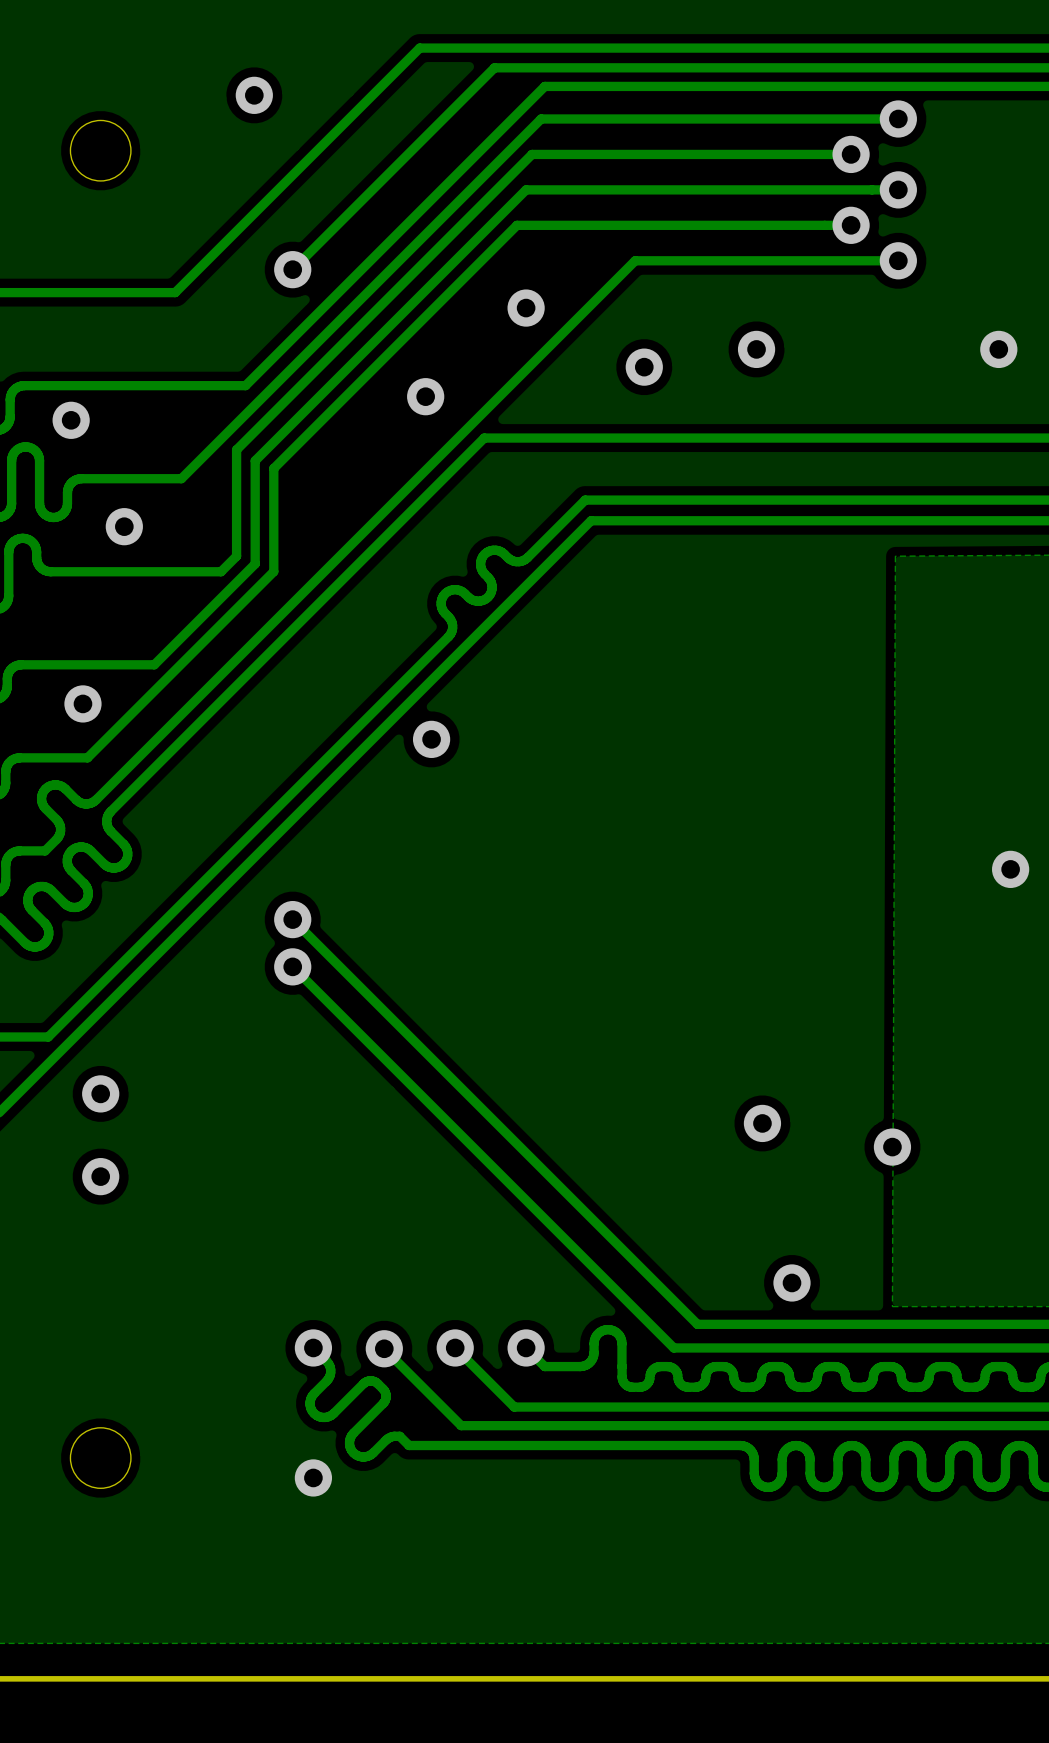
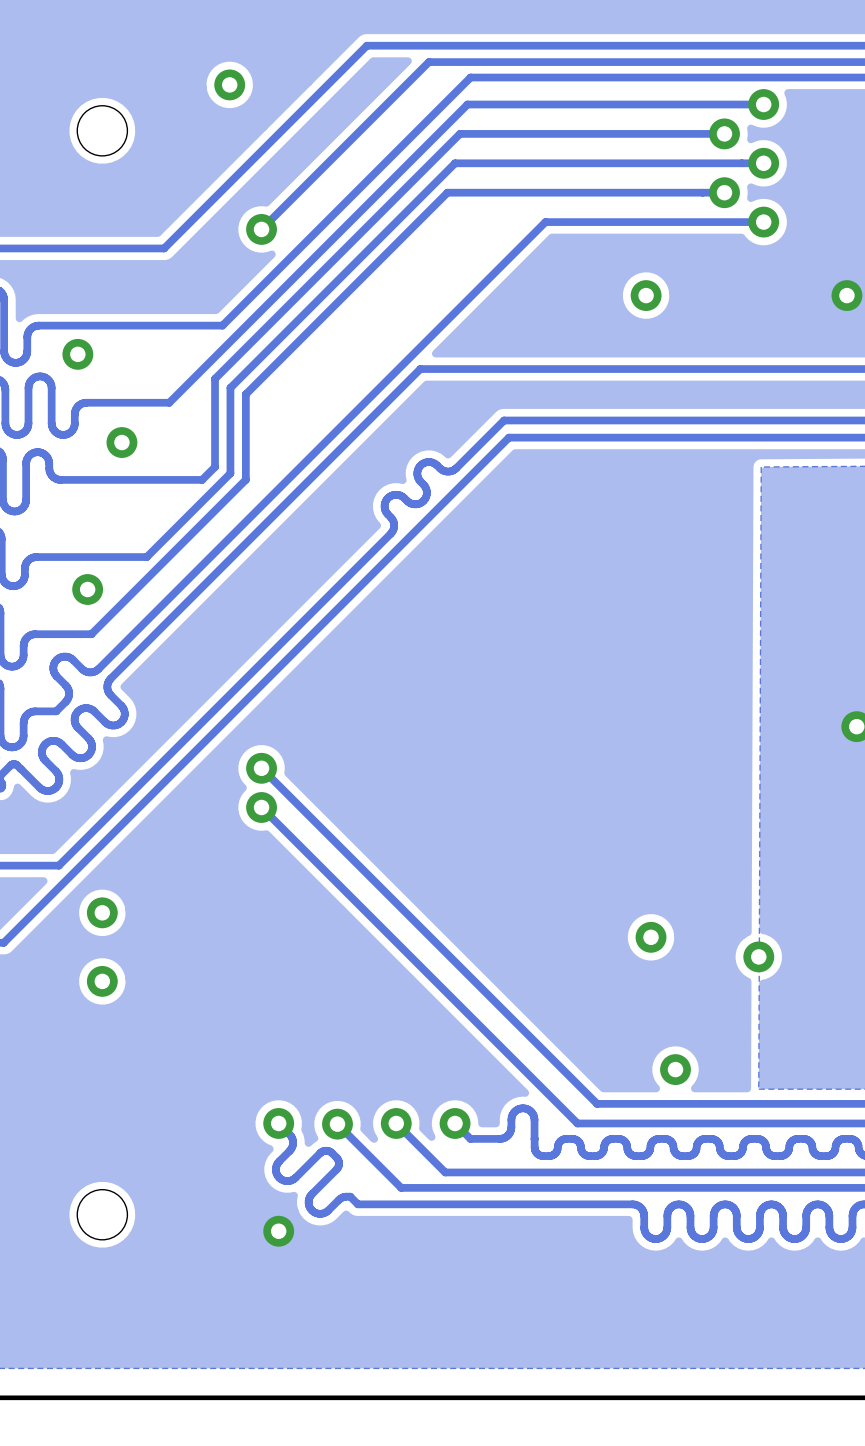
via: (526, 308) -> none
via: (644, 367) -> none
via: (425, 396) -> none
via: (431, 739) -> none

